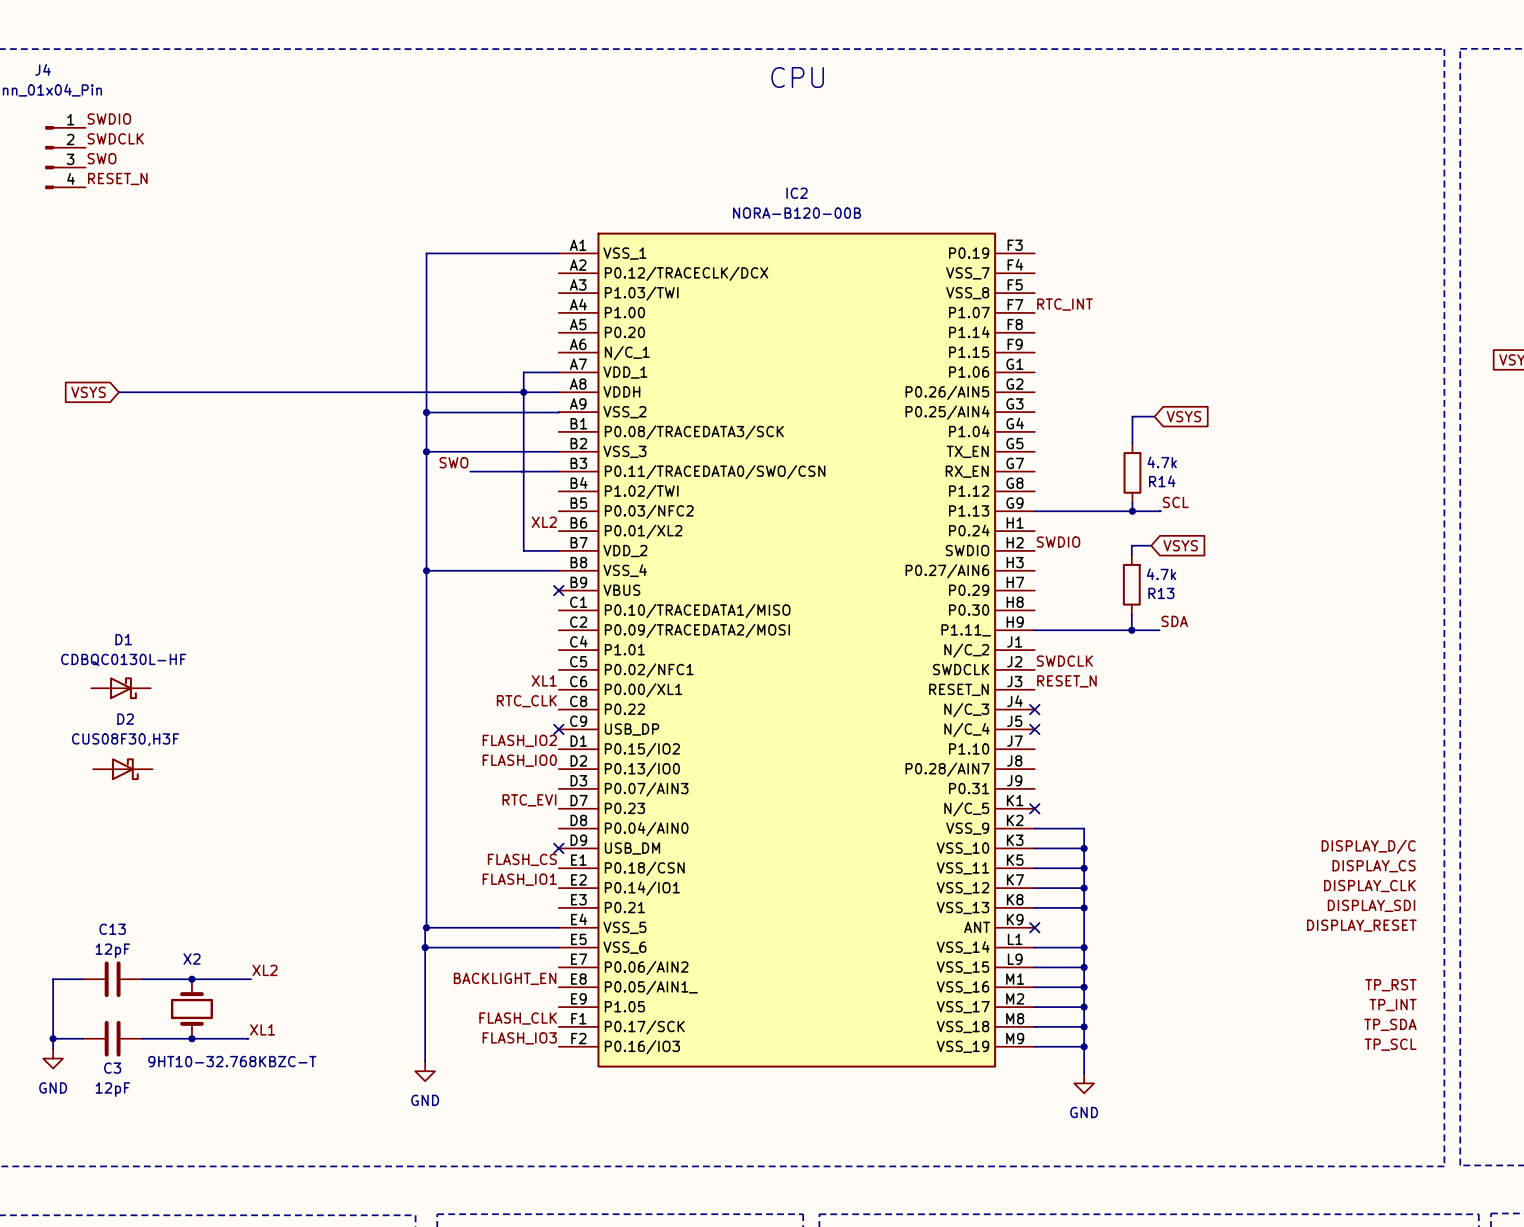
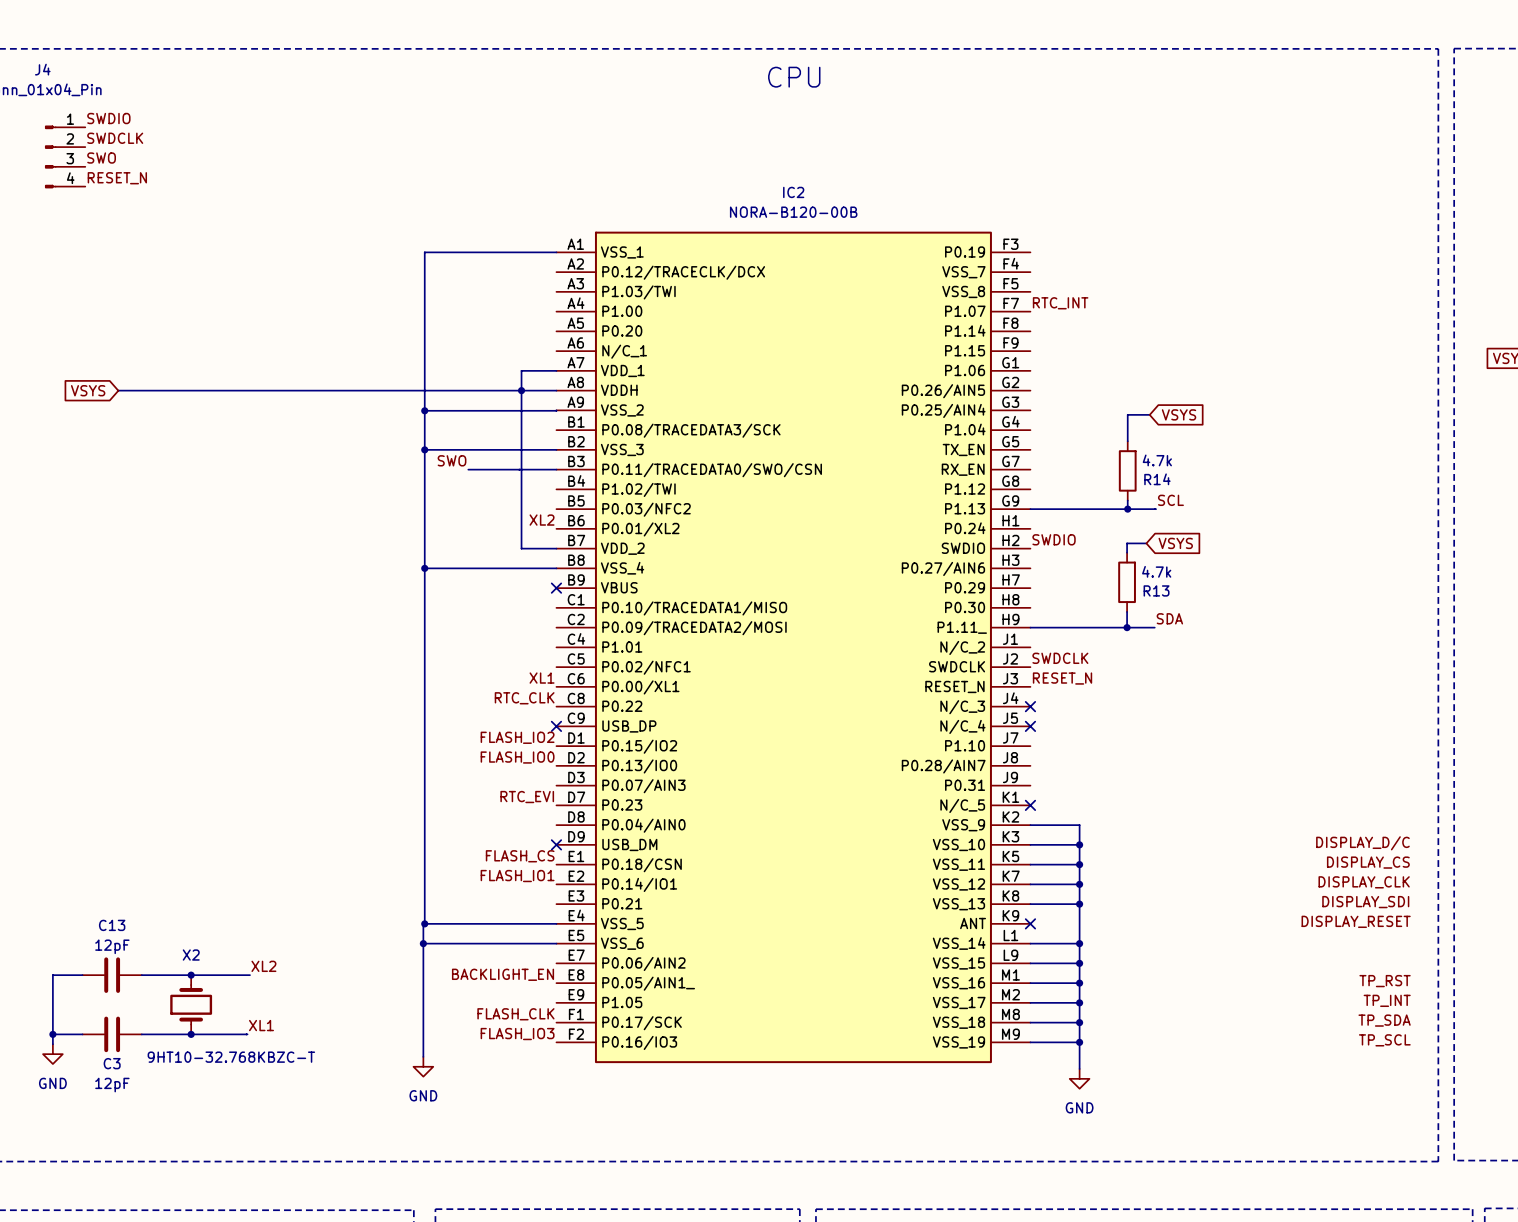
D1: CDBQC0130L-HF (120, 688) -> none
D2: CUS08F30,H3F (122, 769) -> none

